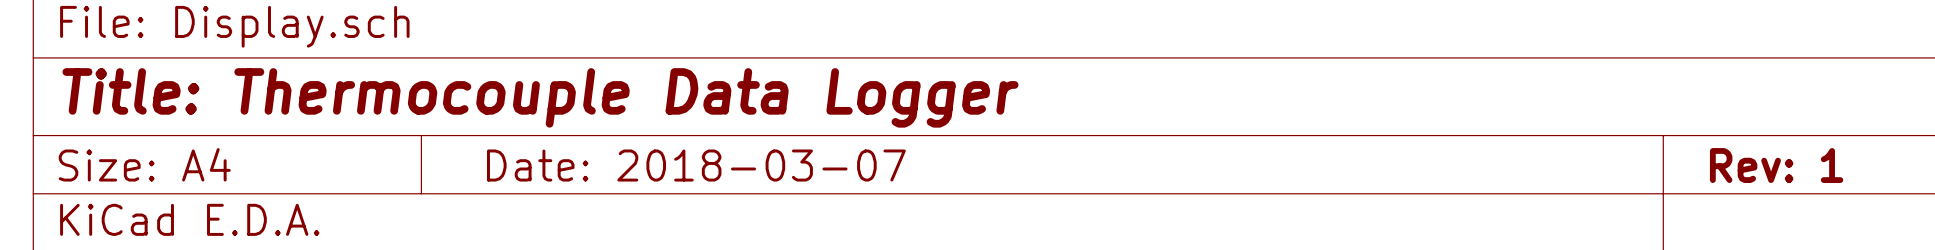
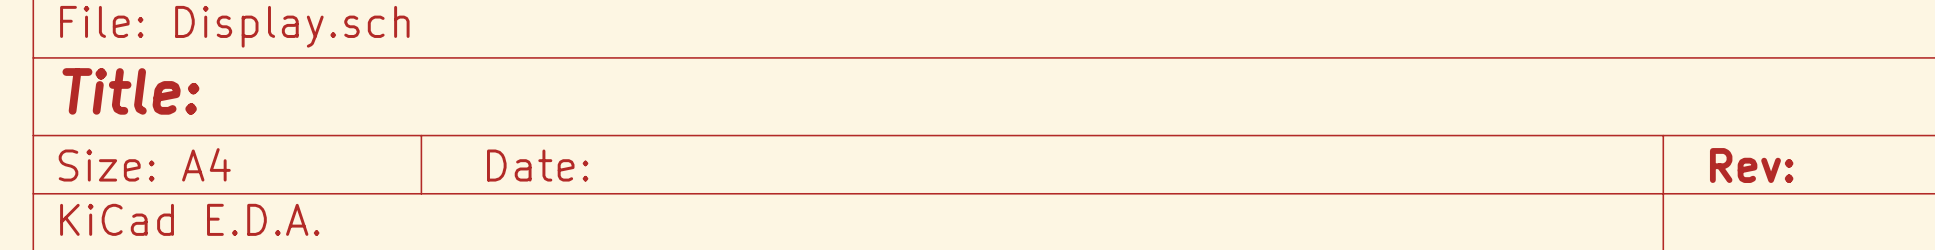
title block: Title: Thermocouple Data Logger (540, 97) -> Title: (130, 91)
title block: Date: 2018-03-07 (696, 165) -> Date: (537, 165)
title block: Rev: 1 (1776, 165) -> Rev: (1751, 165)

